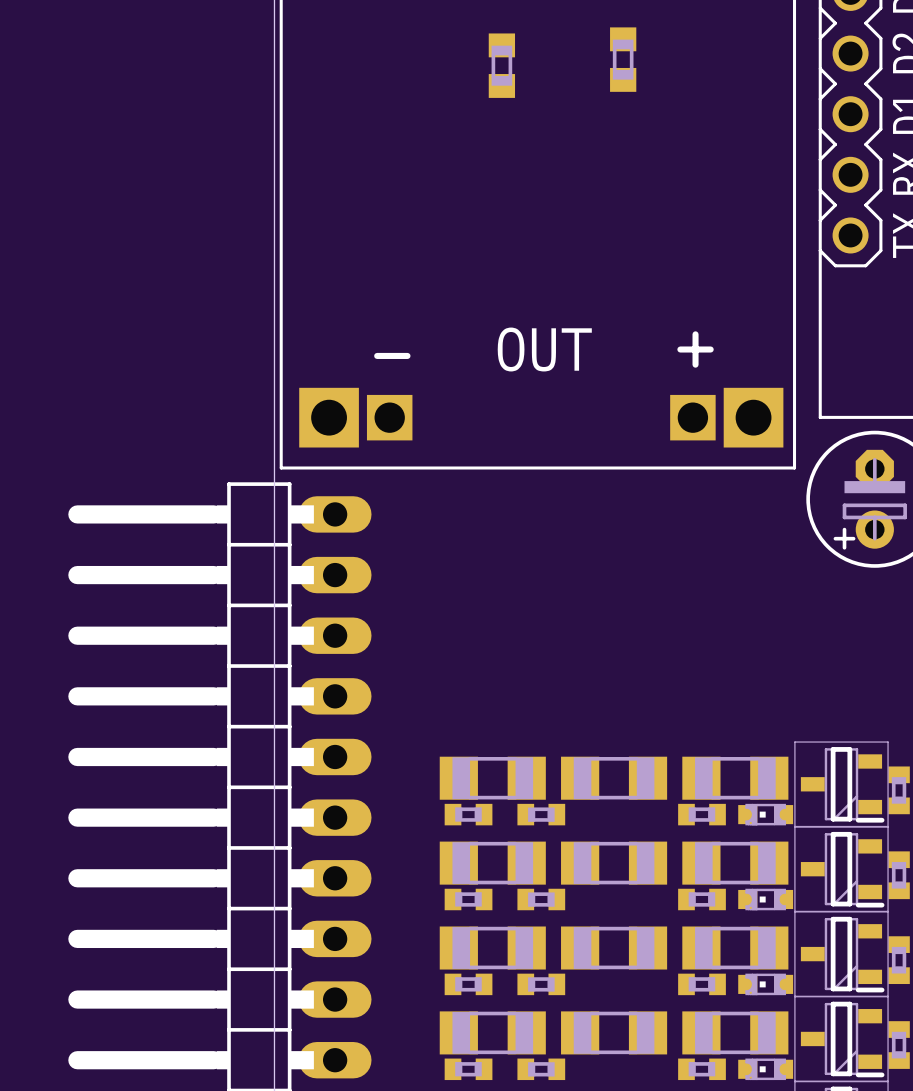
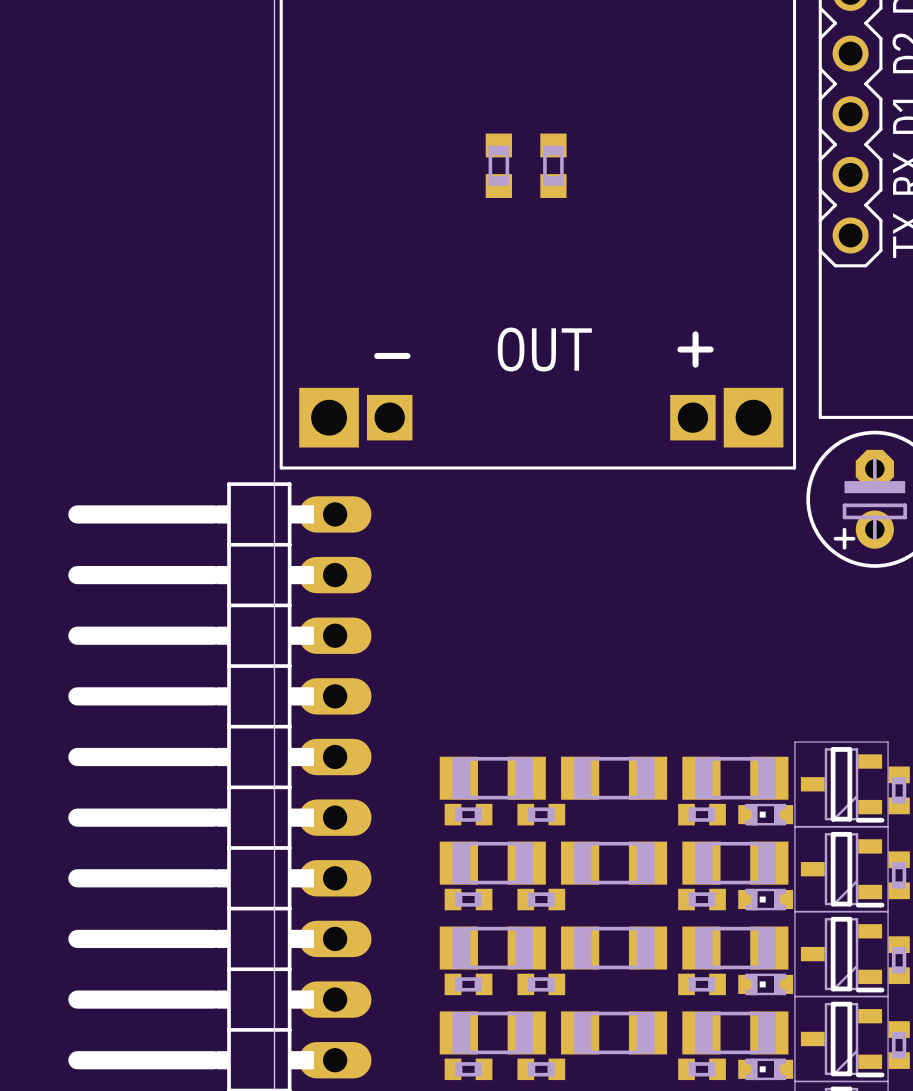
part: (623, 59) -> none
part: (501, 65) -> none
part: none -> (498, 165)
part: none -> (553, 165)

